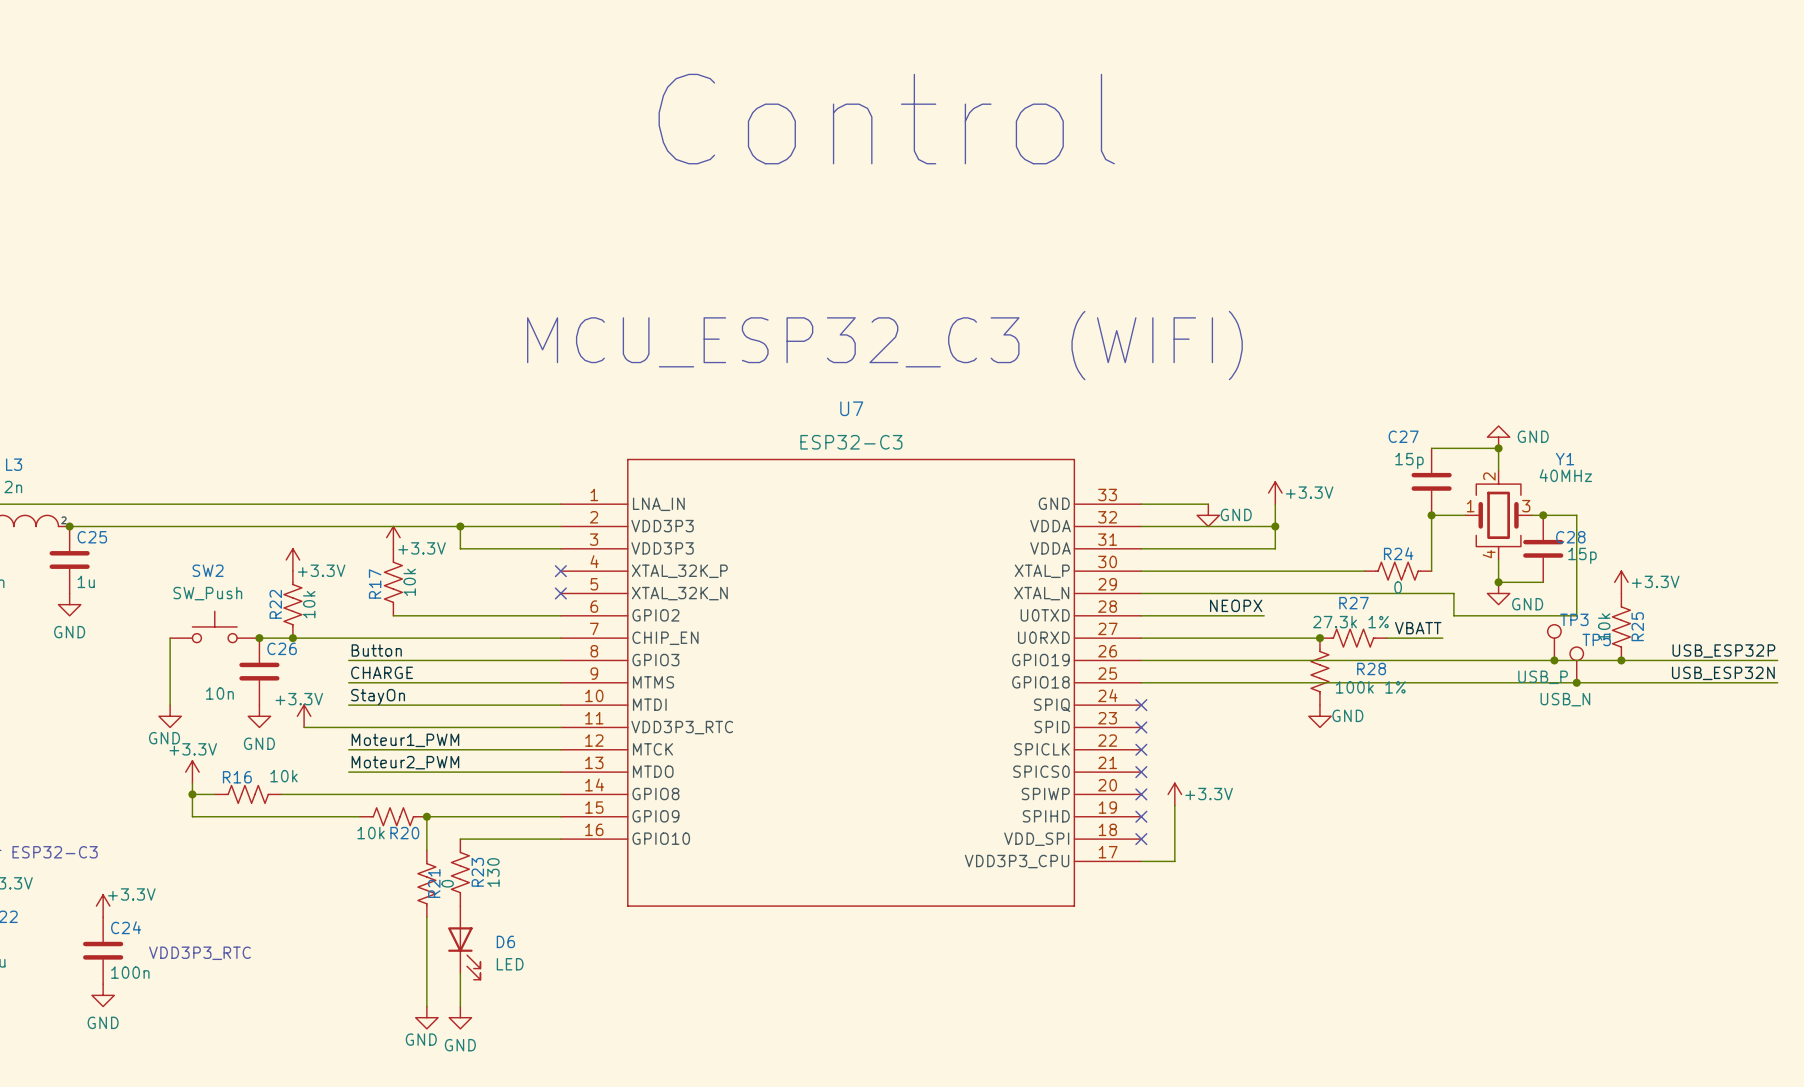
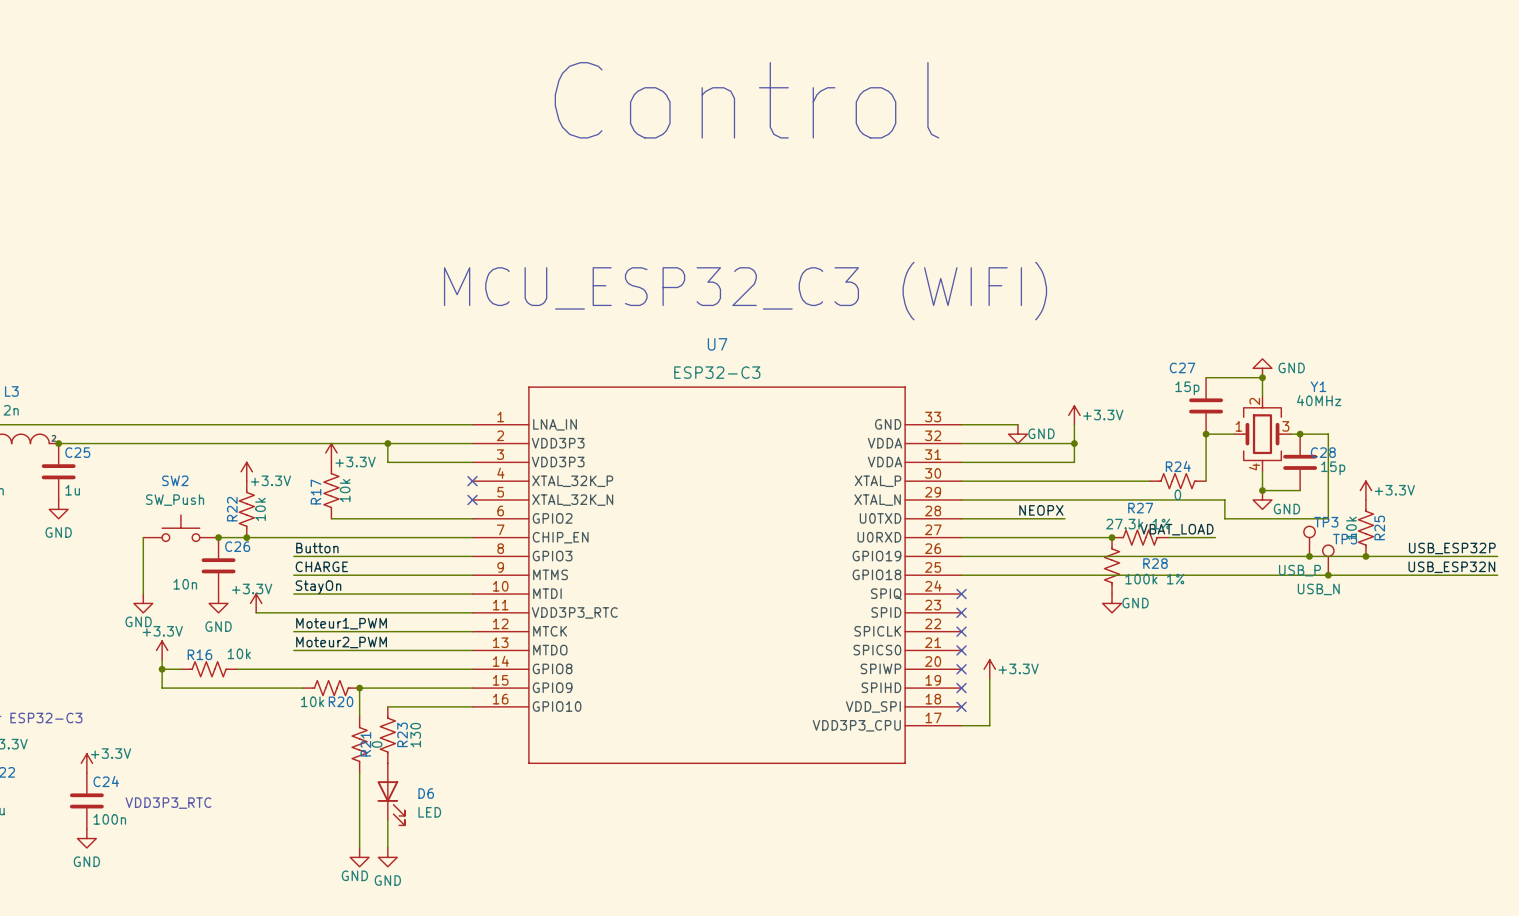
label: VBATT (1418, 628) -> VBAT_LOAD (1176, 529)

